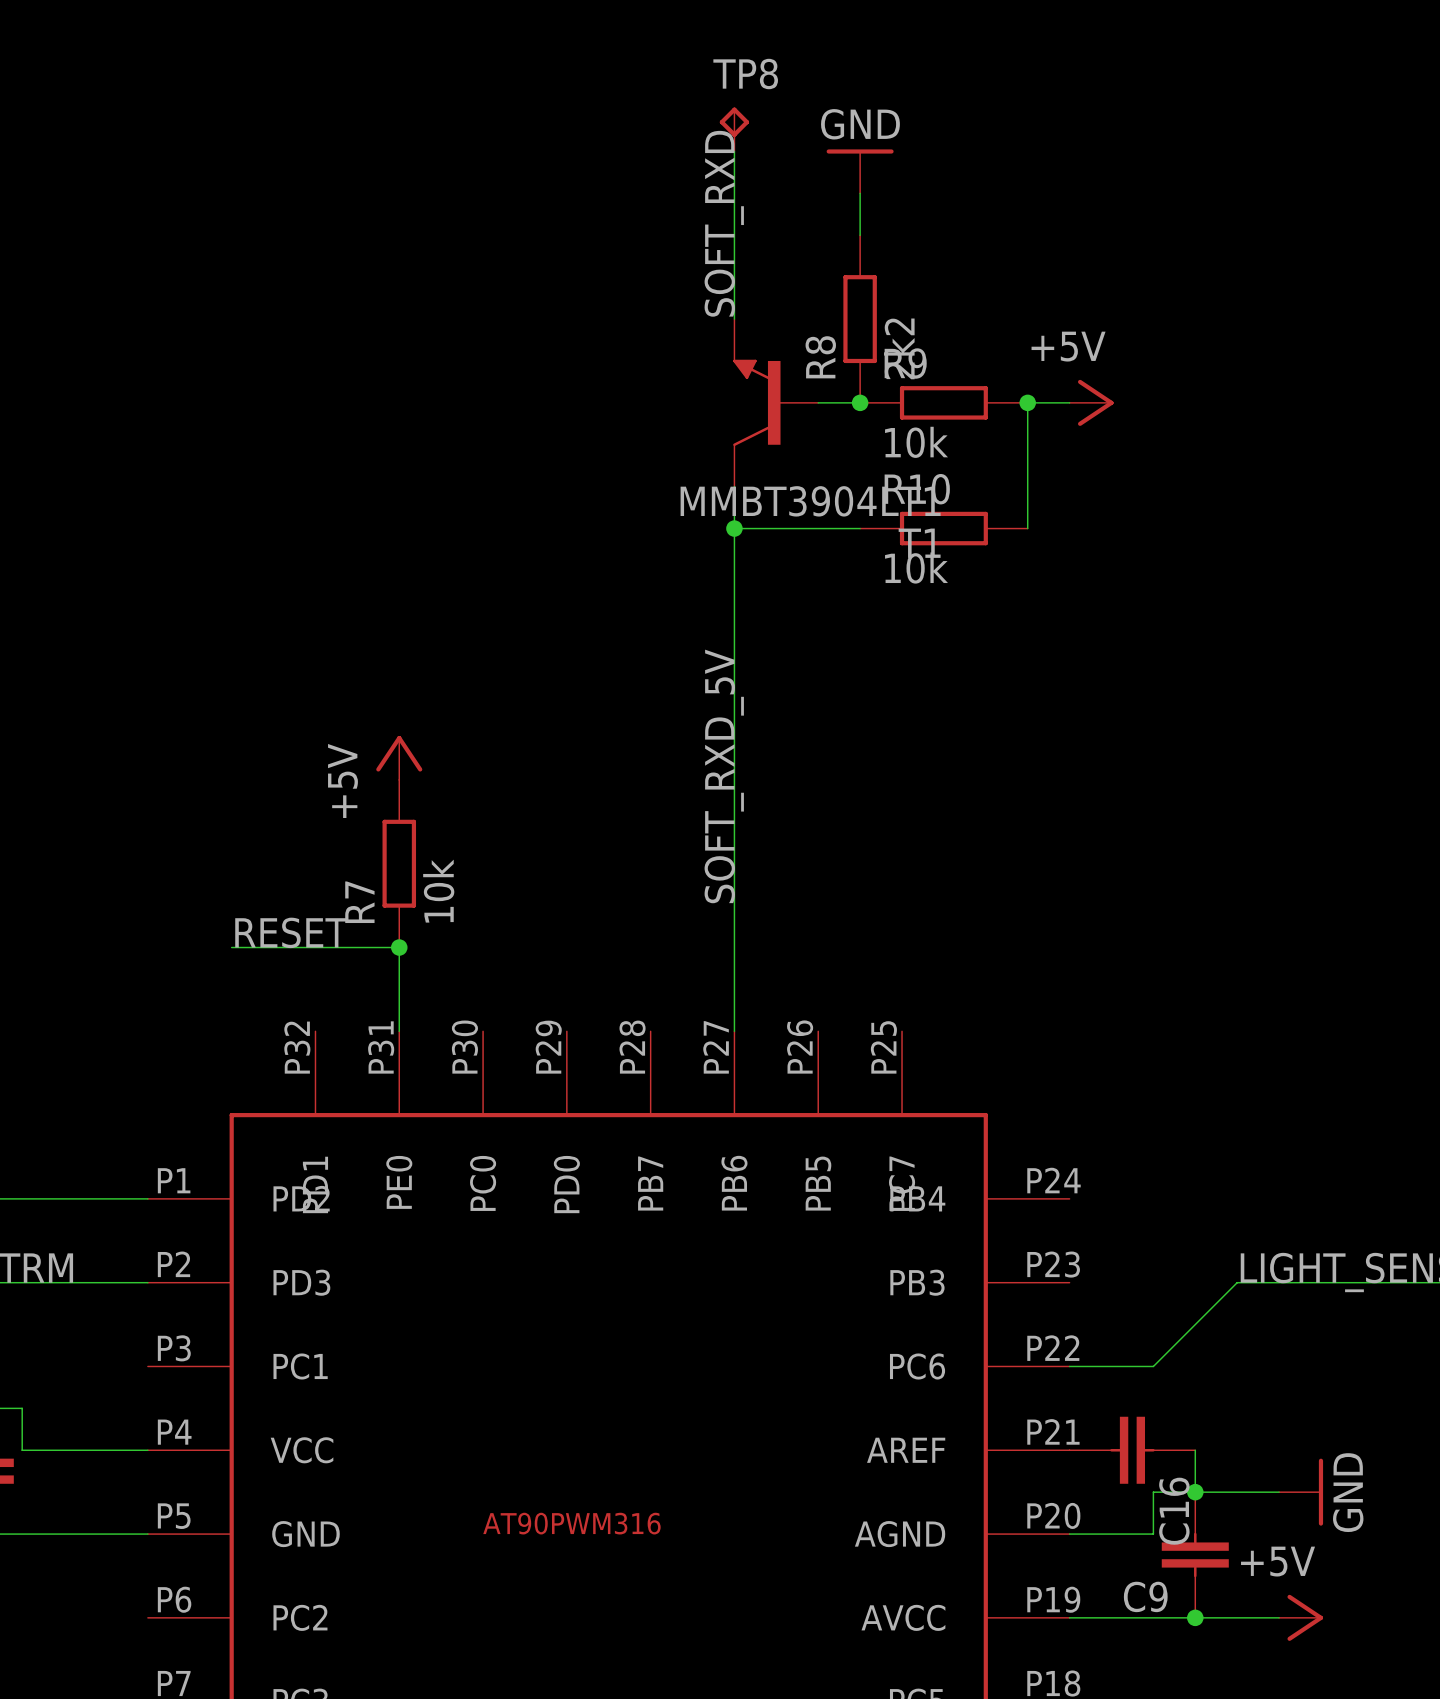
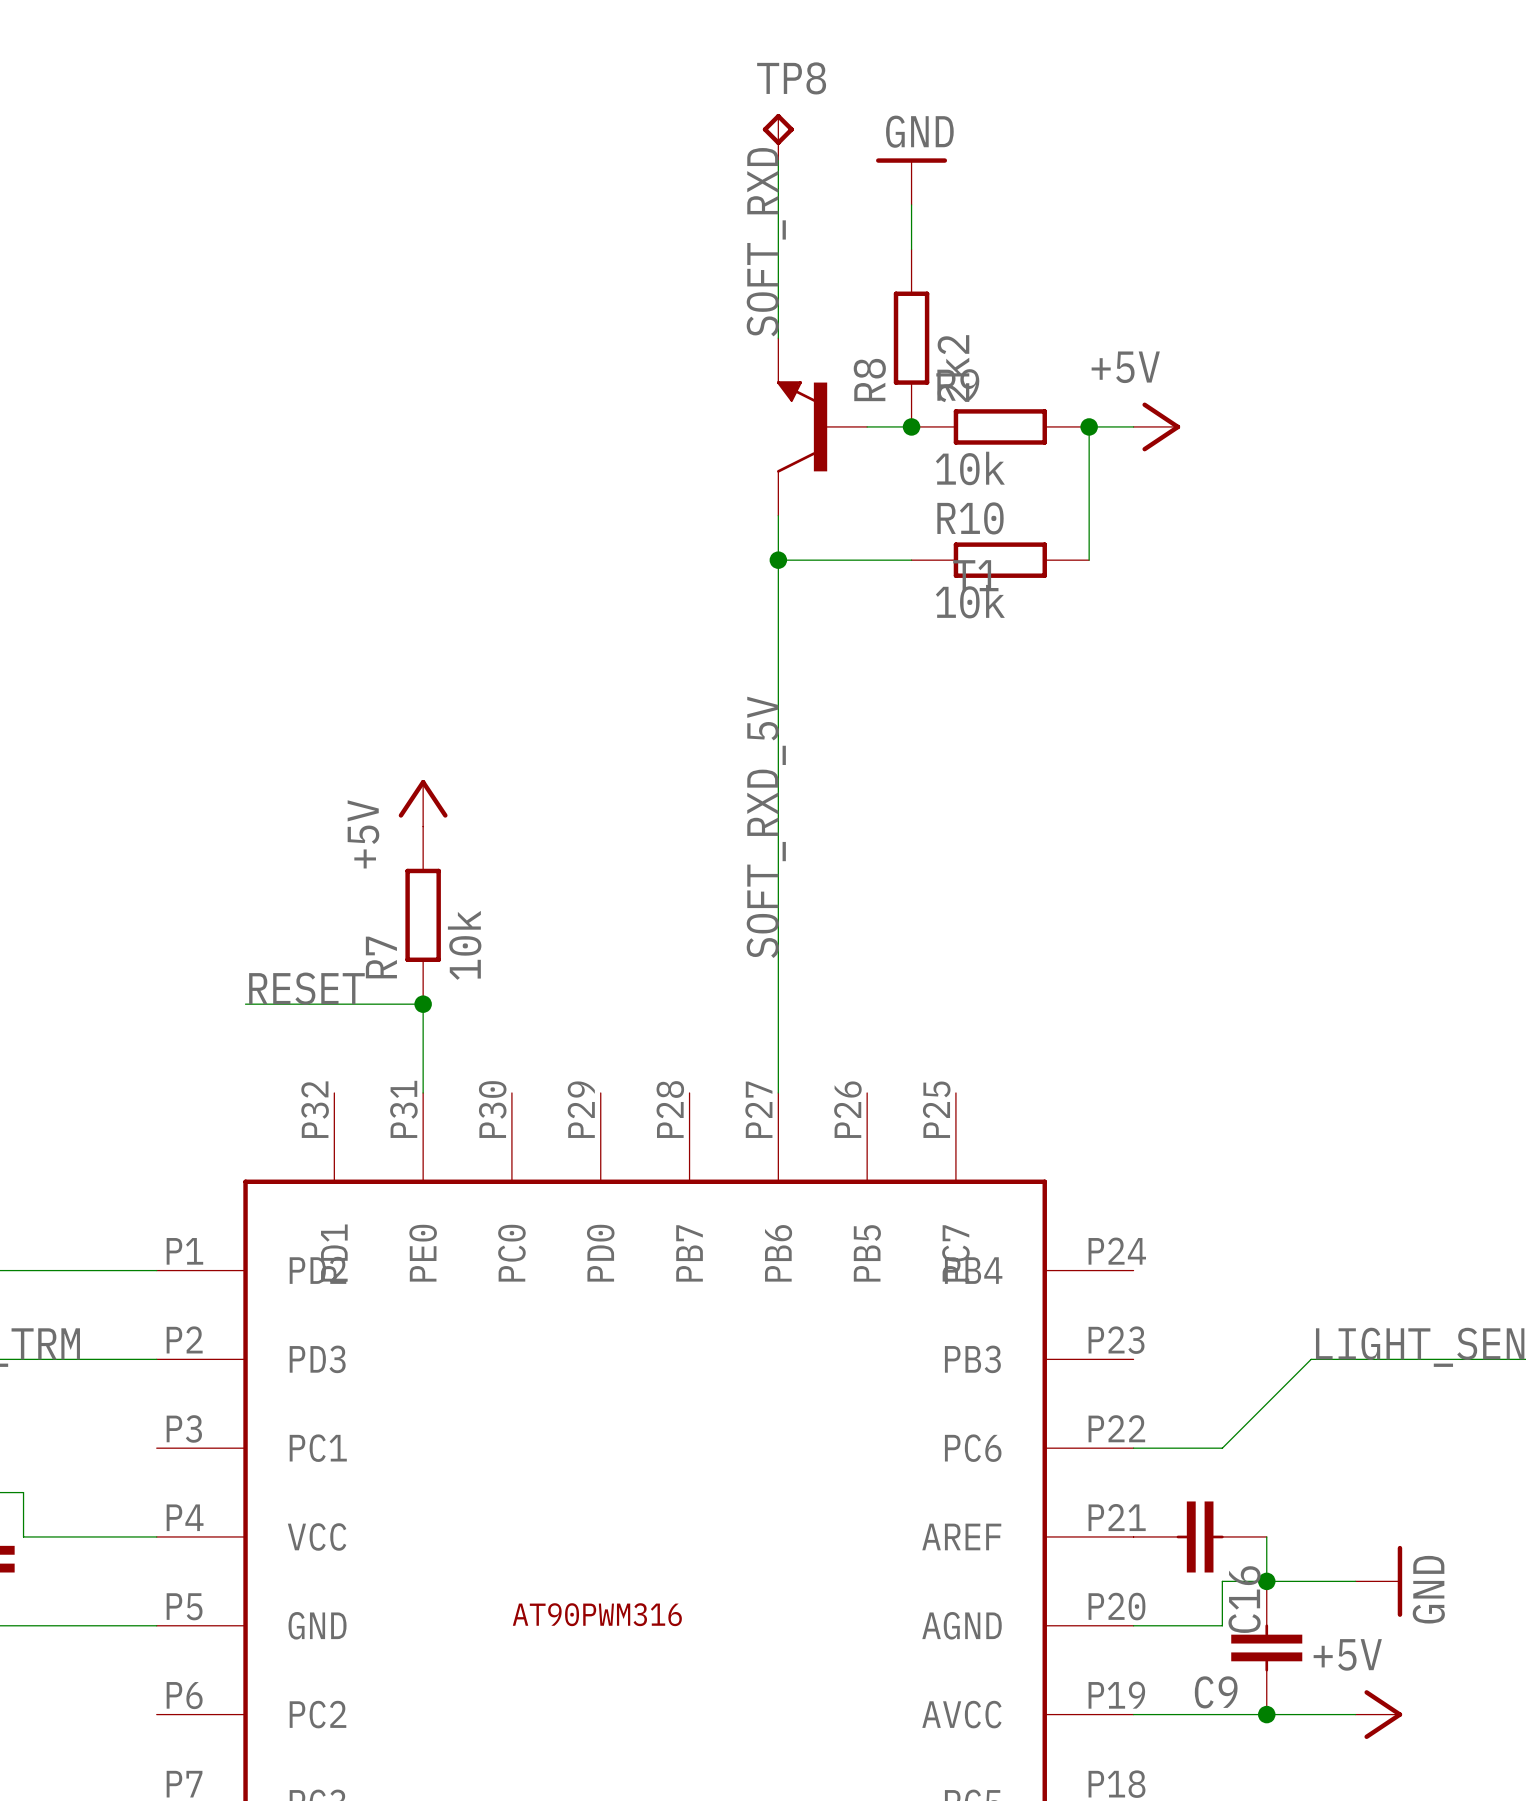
T1 value: MMBT3904LT1 (810, 501) -> none

